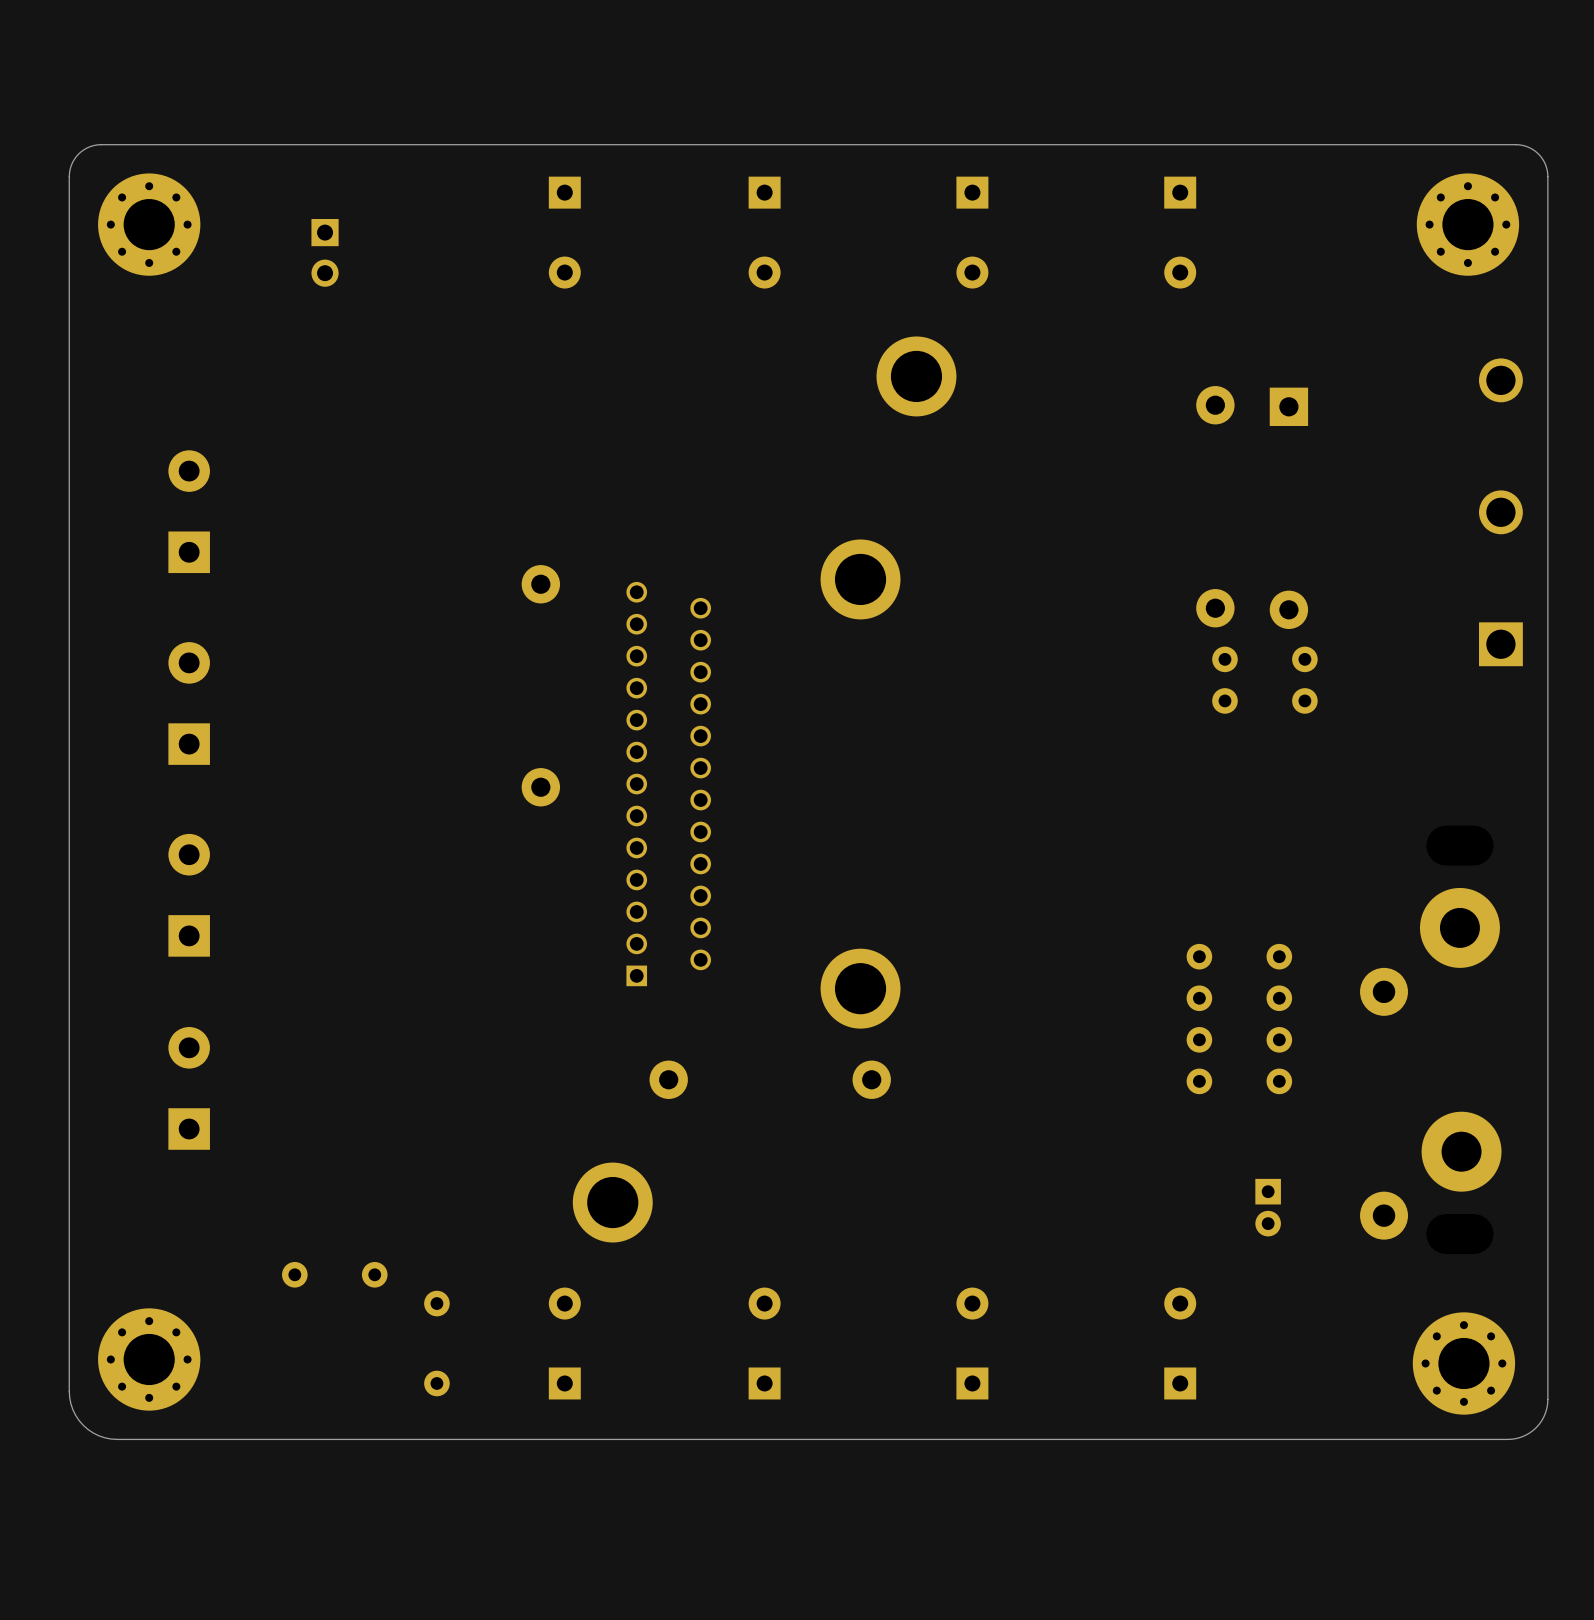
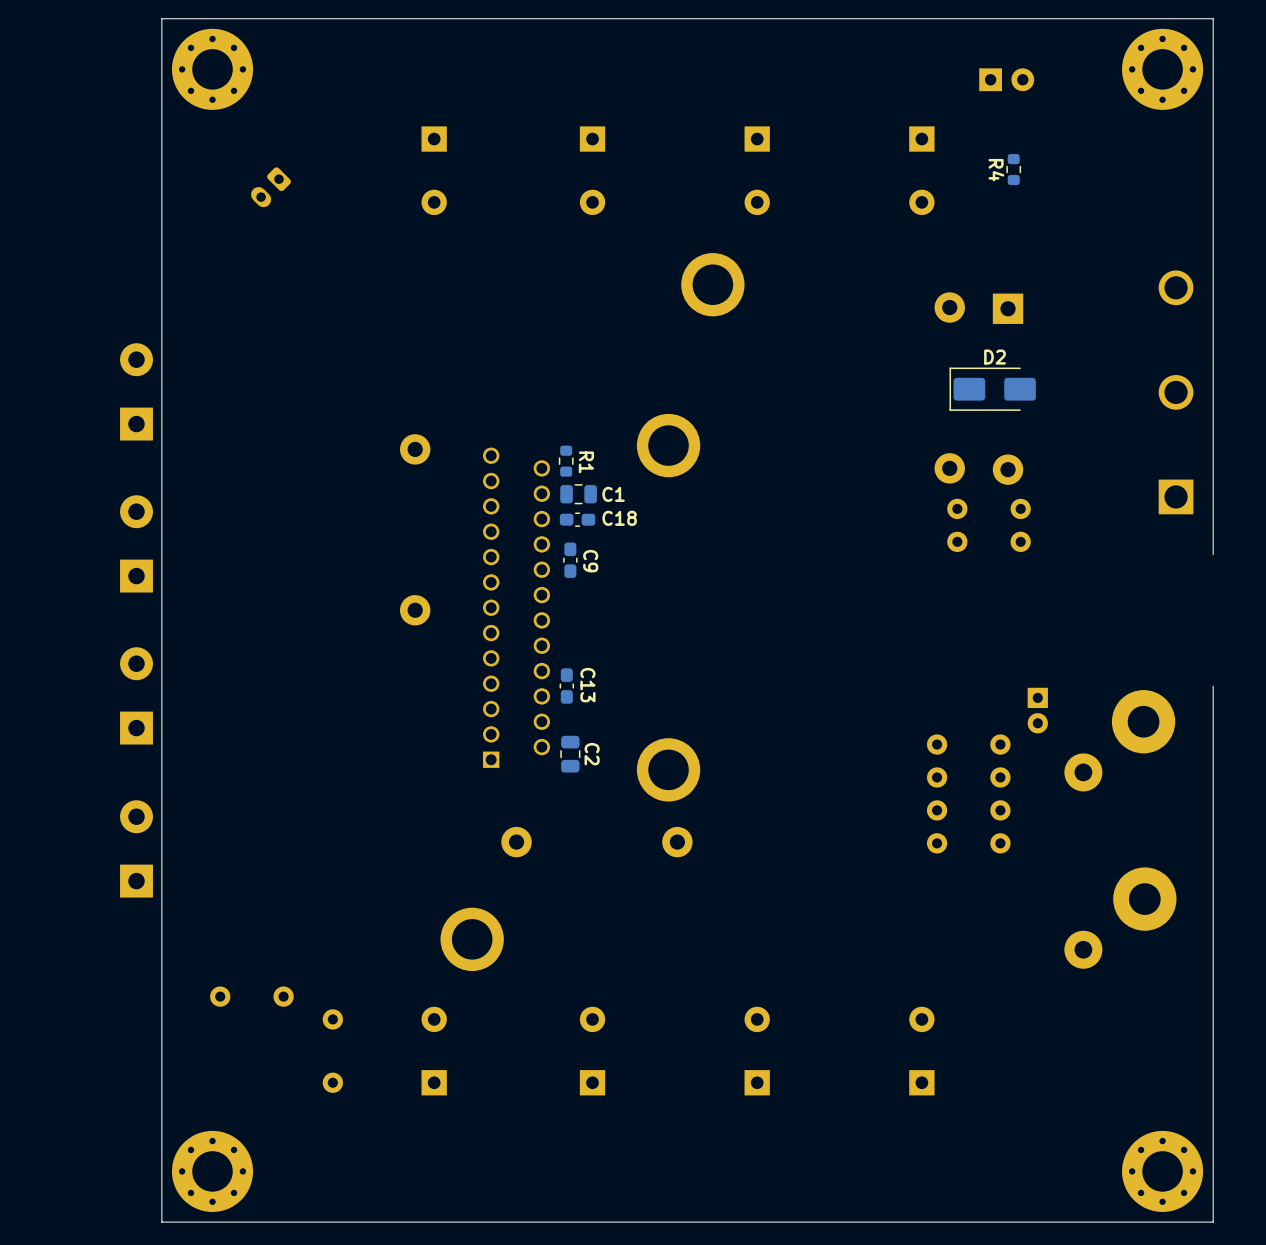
part: none -> (1006, 79)
board edge: (1547, 176) (1546, 166) (1538, 154) (1526, 146) (1515, 144) (101, 144) (87, 147) (78, 154) (72, 162) (69, 176) (69, 1391) (72, 1409) (79, 1420) (88, 1429) (104, 1437) (117, 1439) (1507, 1439) (1525, 1435) (1536, 1427) (1543, 1416) (1547, 1399) -> (1213, 126) (1213, 18) (161, 18) (161, 1222) (1213, 1222) (1213, 1095)
part position: (149, 224) -> (212, 69)
part position: (1467, 224) -> (1162, 69)
R4: none -> (1013, 169)
part: (325, 252) -> none
part: none -> (270, 187)
D2: none -> (992, 389)
R1: none -> (566, 461)
C1: none -> (578, 494)
C18: none -> (577, 519)
board edge: (1547, 716) (1547, 883) -> none
C9: none -> (570, 560)
C13: none -> (566, 686)
C2: none -> (570, 754)
part position: (1268, 1207) -> (1037, 710)
part position: (149, 1359) -> (212, 1171)
part position: (1463, 1363) -> (1162, 1171)

